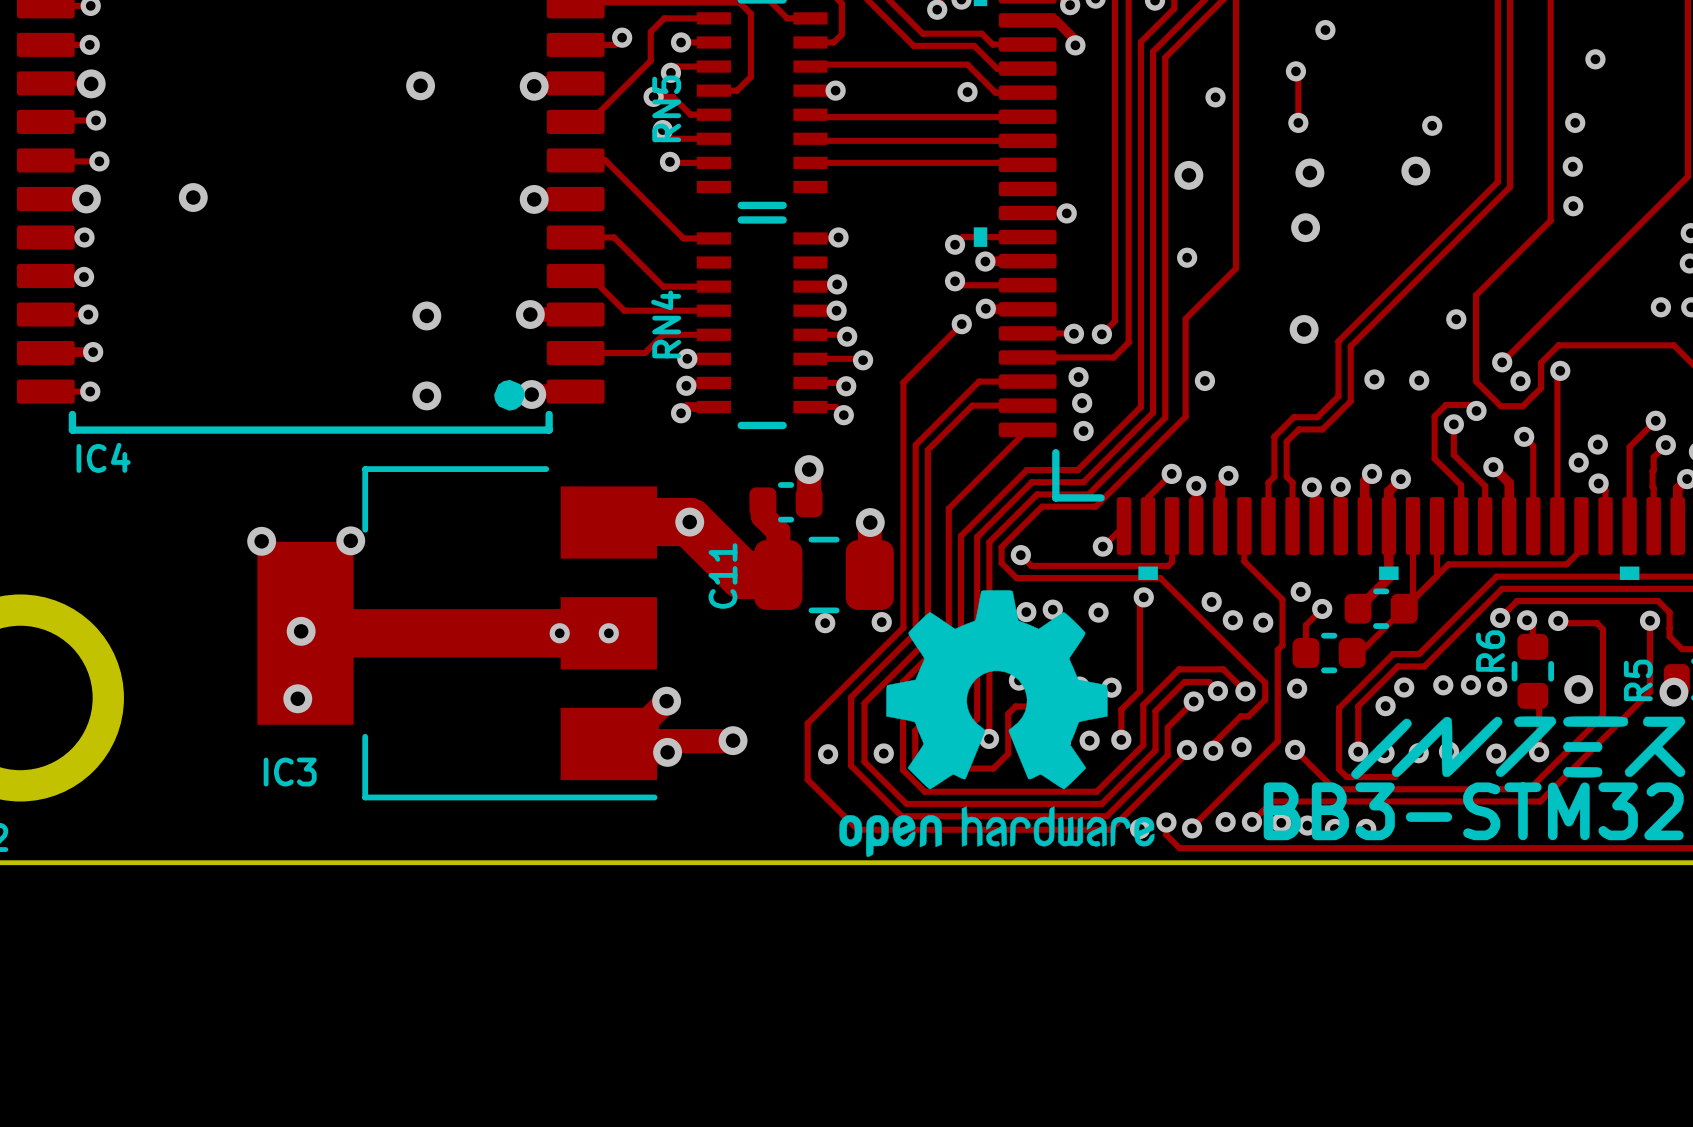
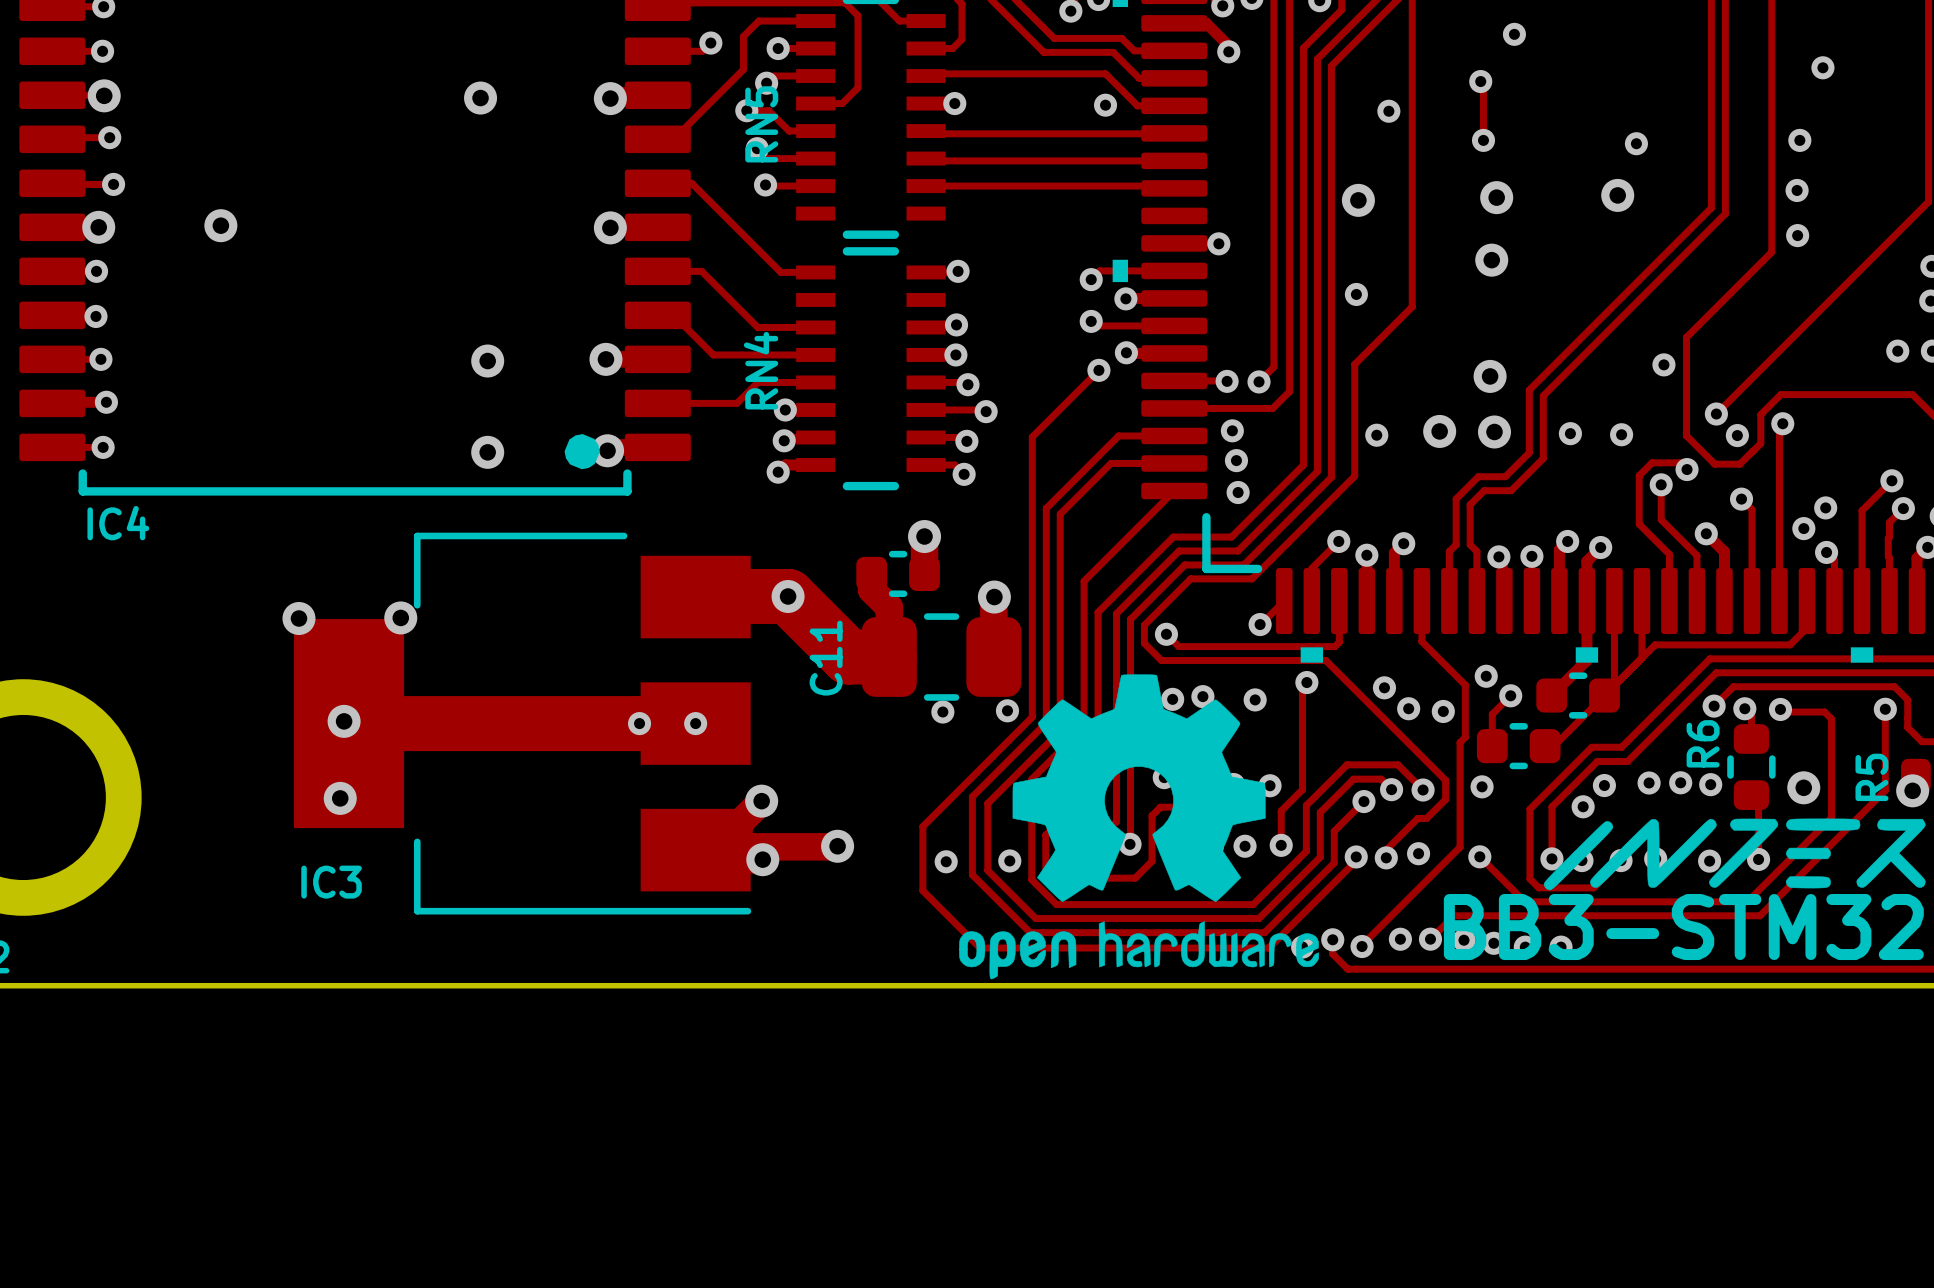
via: none -> (1439, 431)
via: none -> (1494, 431)

